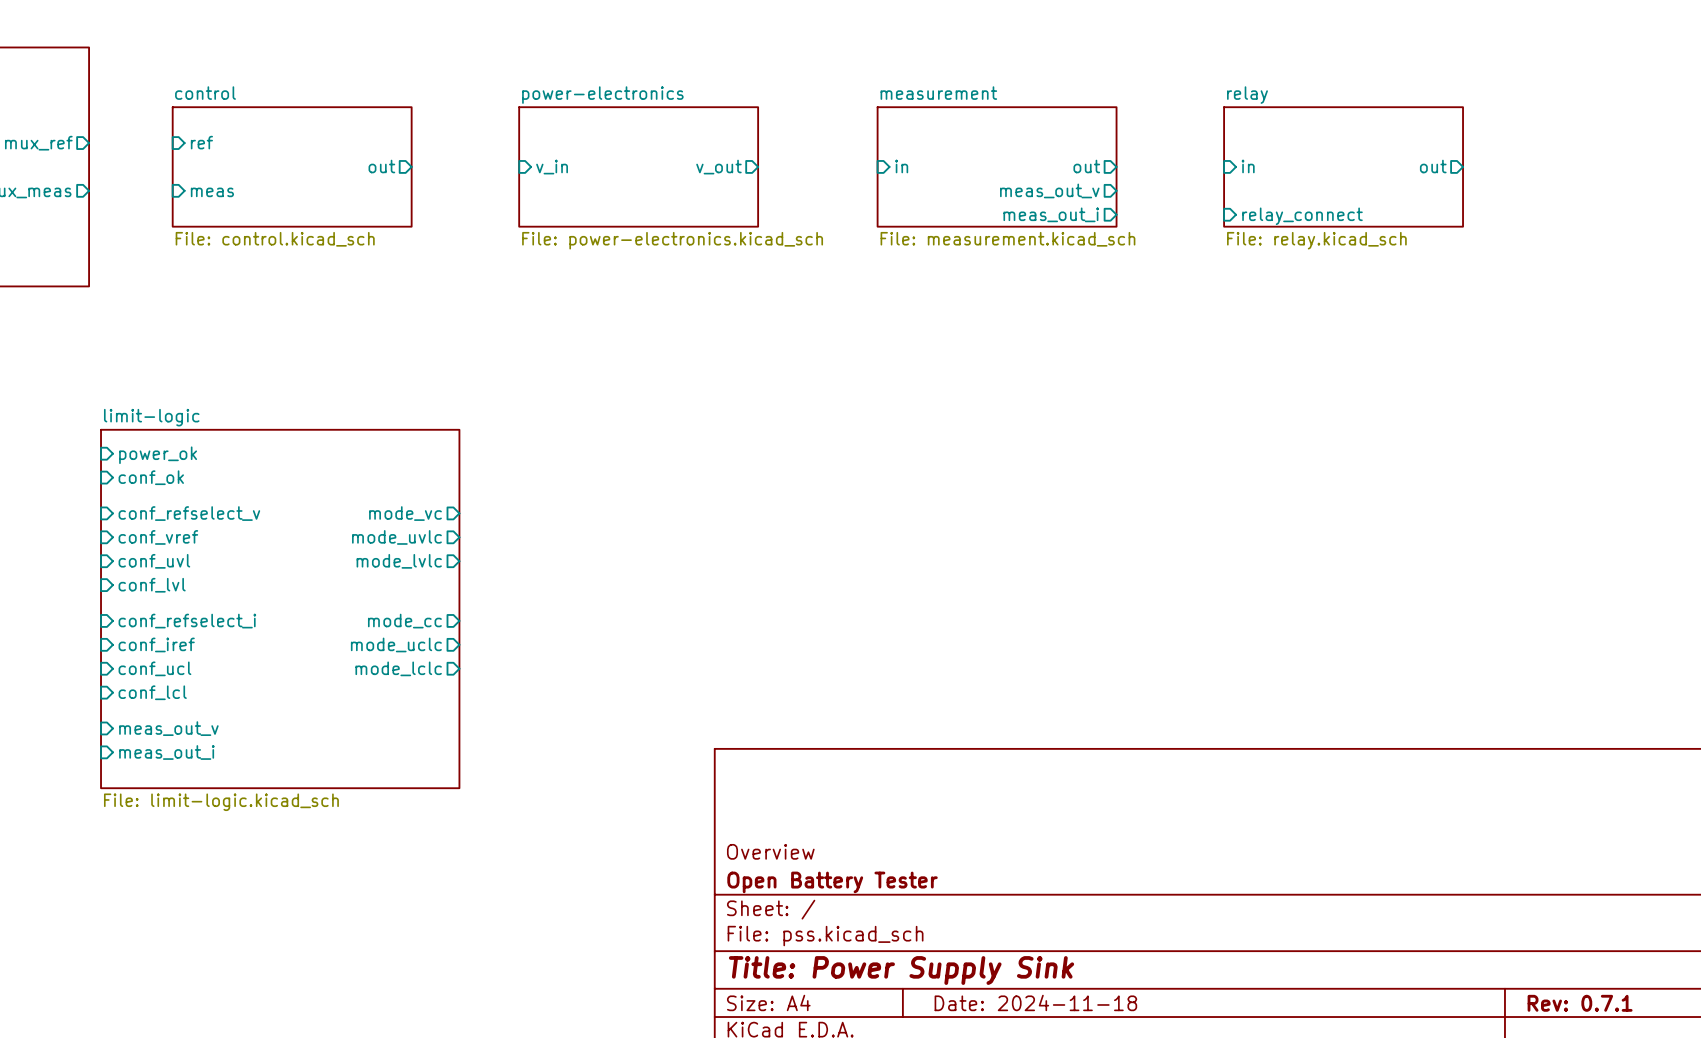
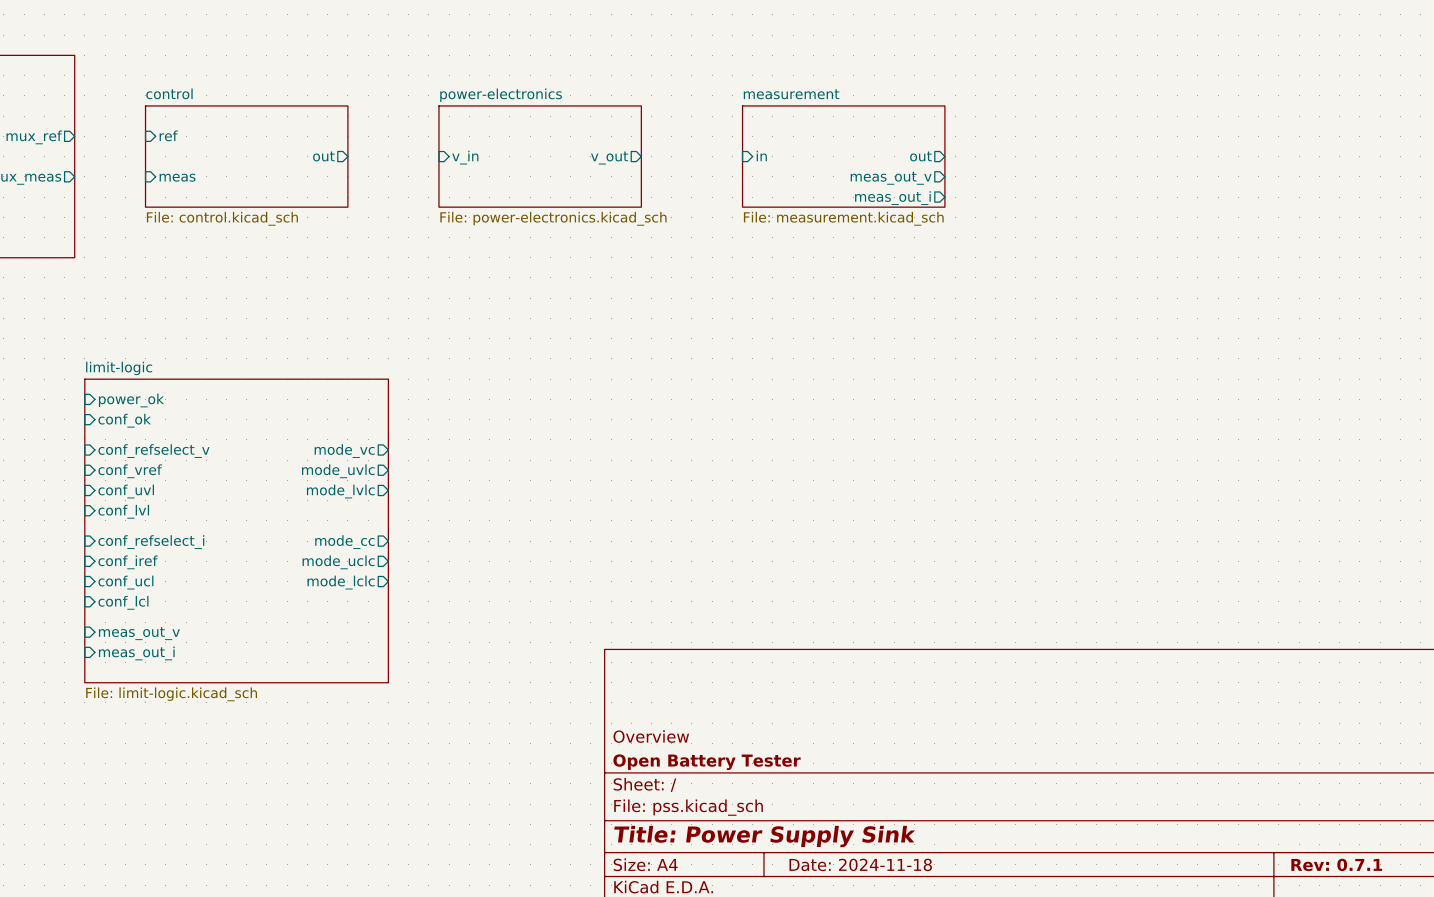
sheet pin: in (1248, 166) -> none
sheet relay: File: relay.kicad_sch (1343, 166) -> none
sheet pin: out (1433, 166) -> none
sheet pin: relay_connect (1302, 216) -> none

